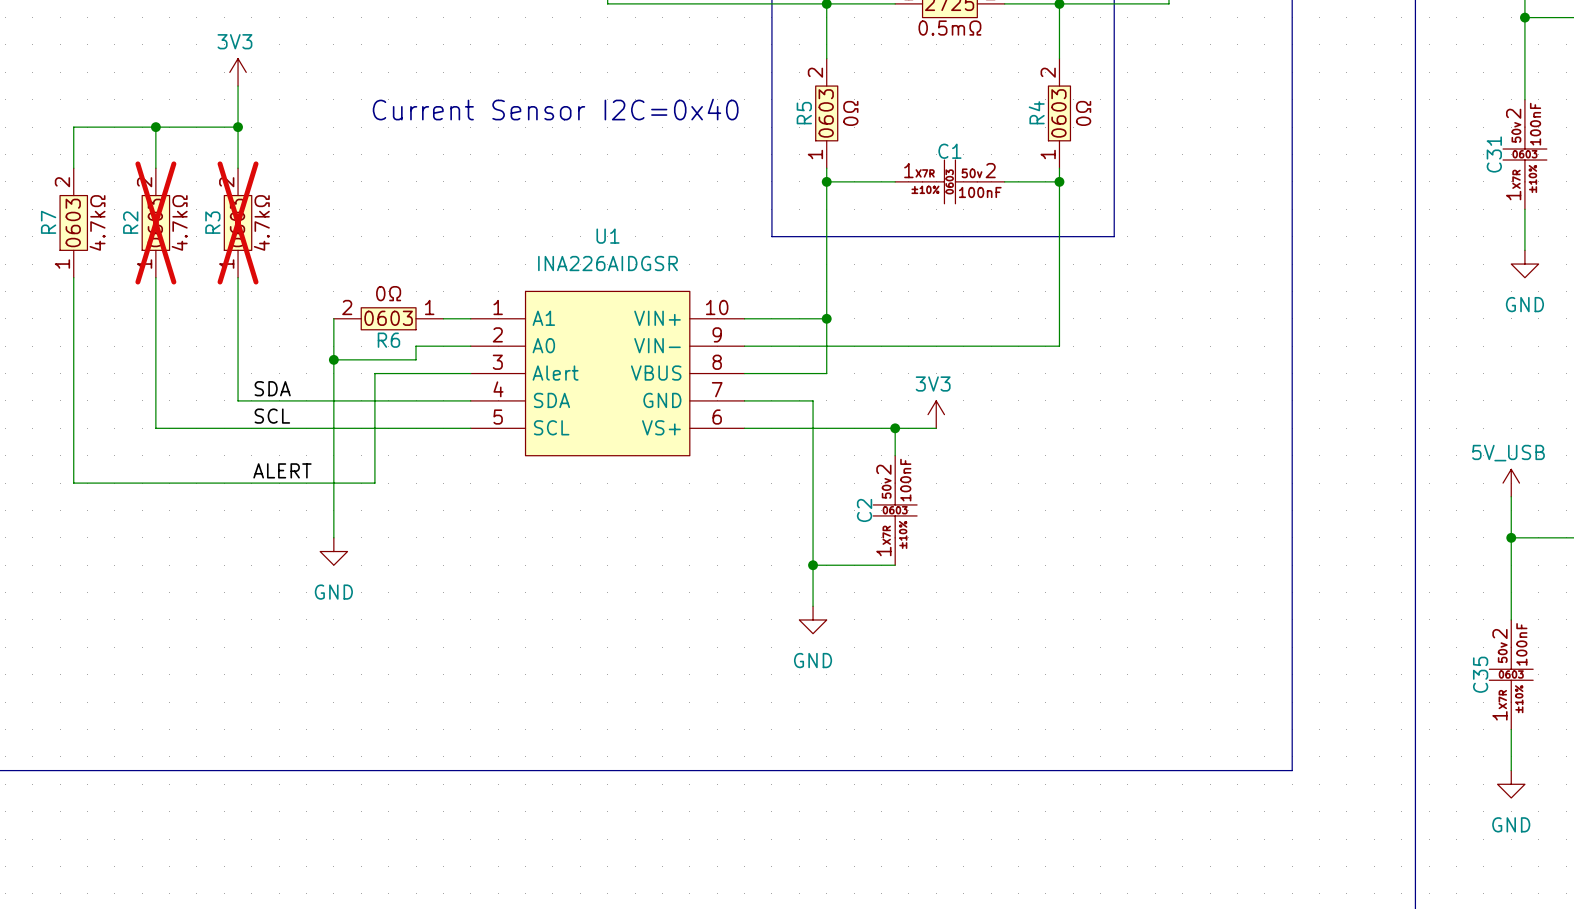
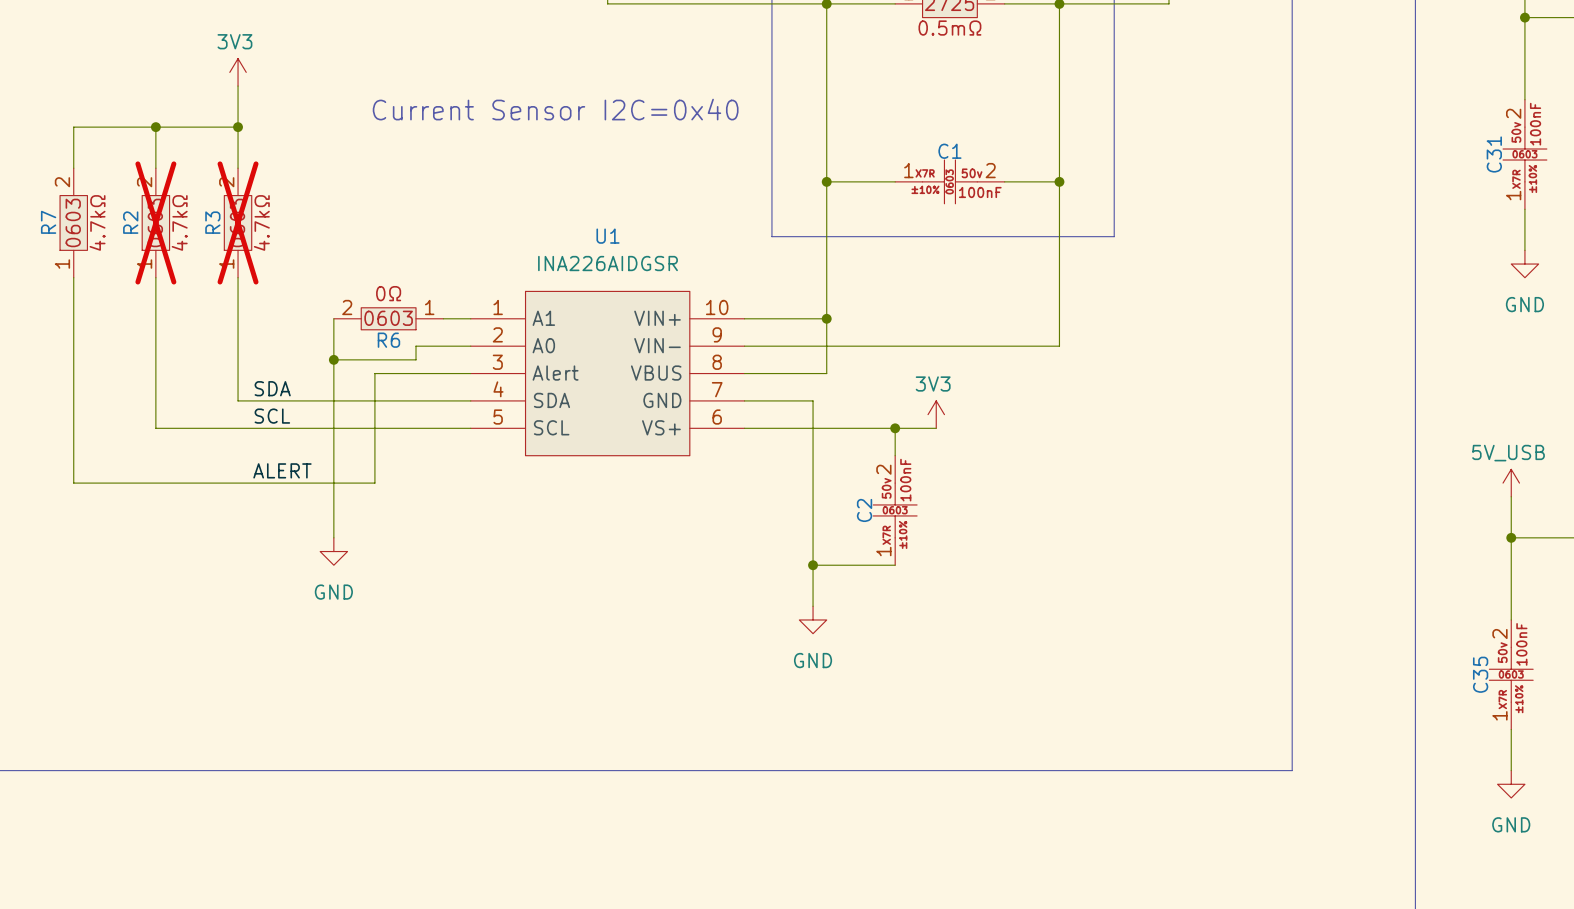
R5: (826, 113) -> none
R4: (1059, 113) -> none

